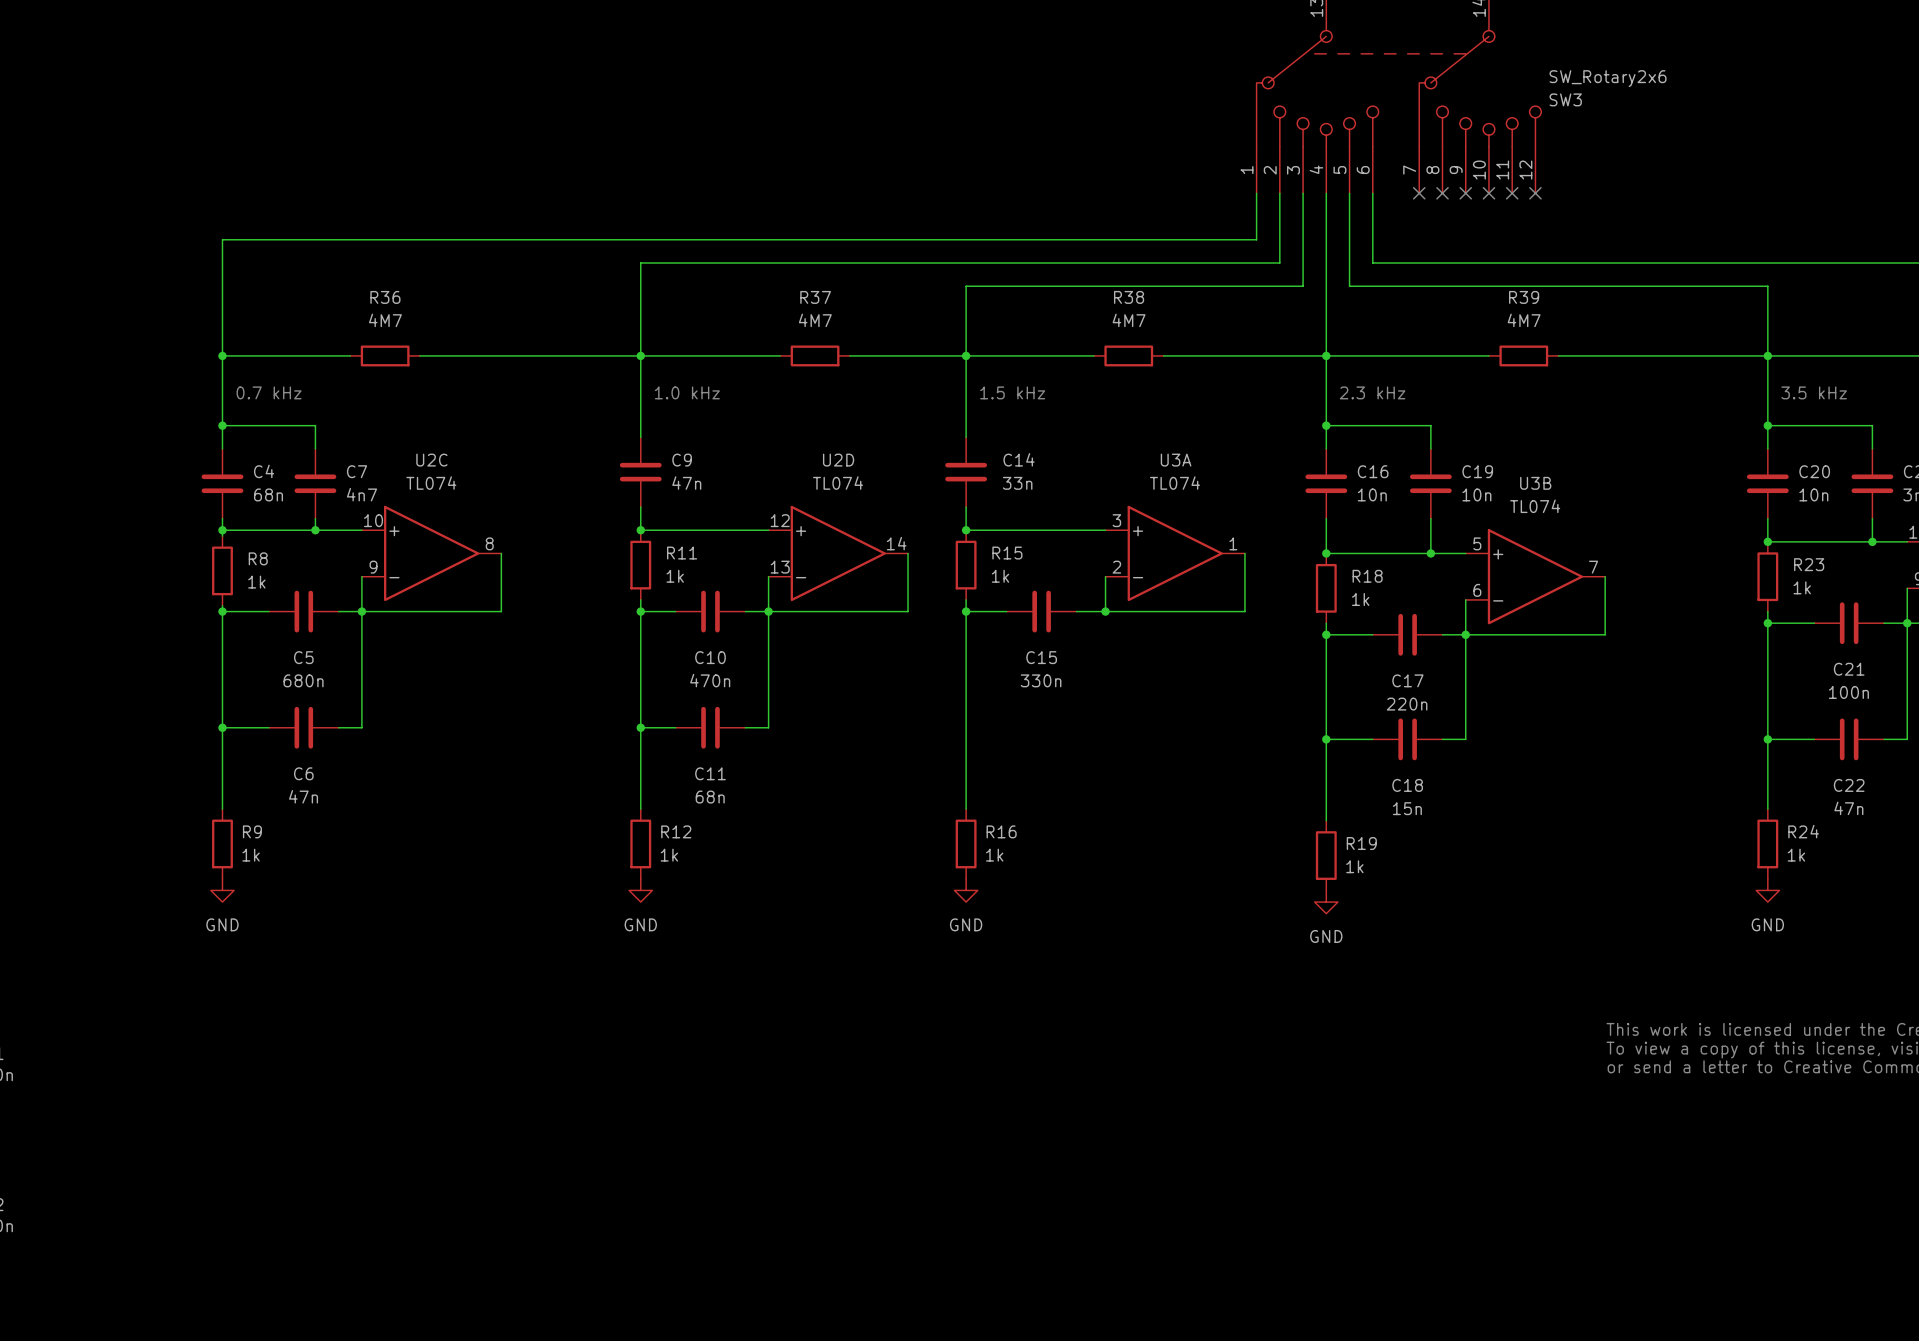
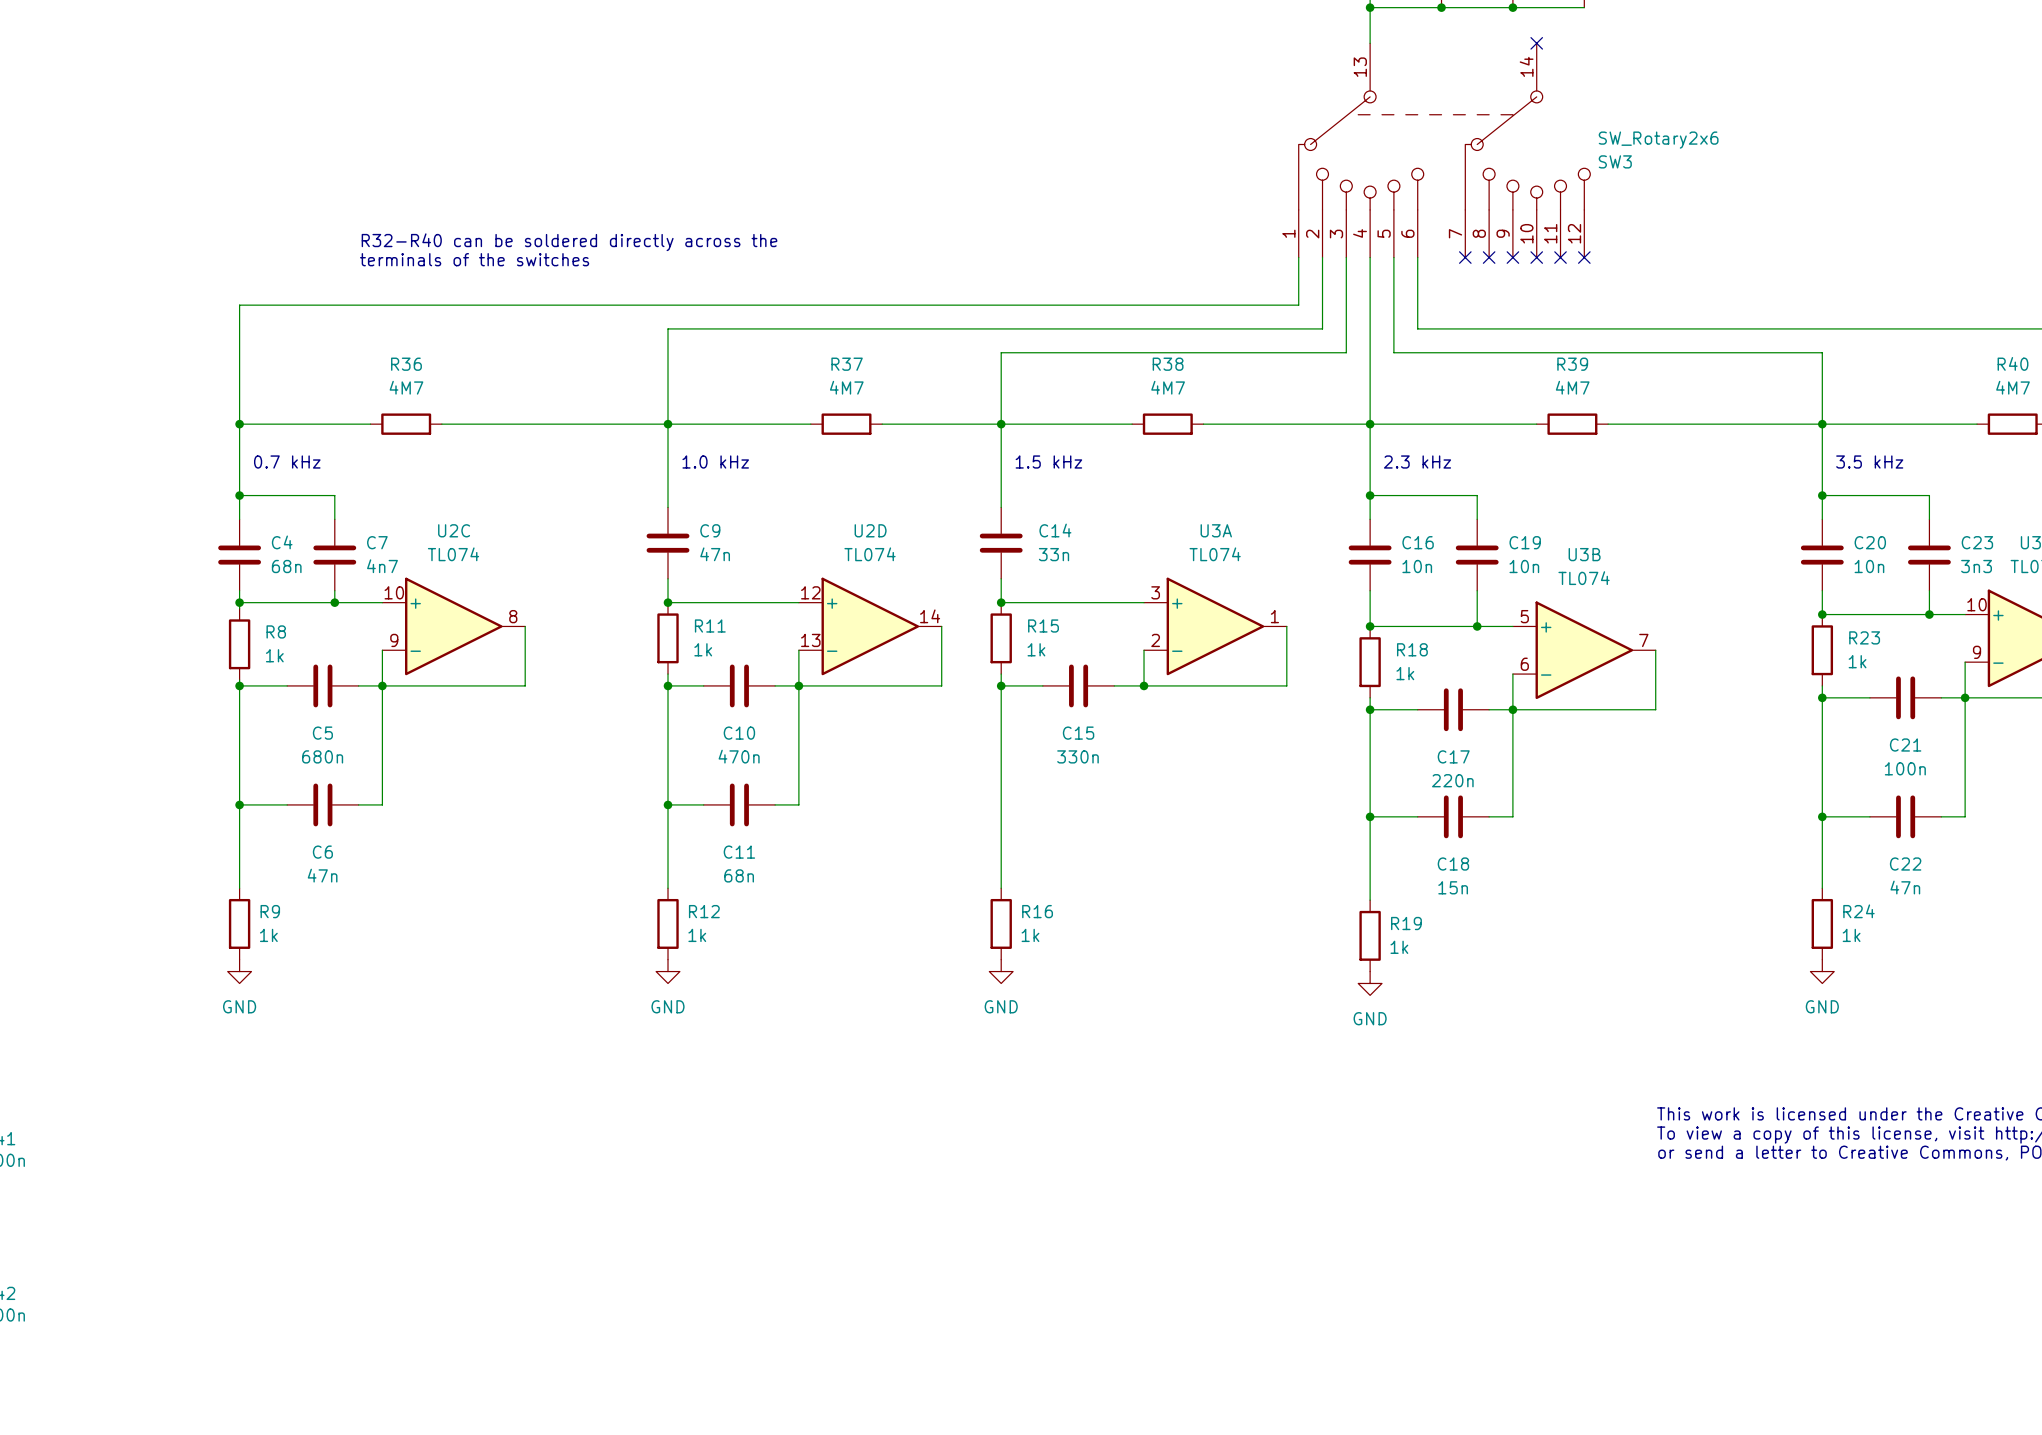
text: none -> R32-R40 can be soldered directly across the (569, 242)
text: none -> terminals of the switches (474, 259)

